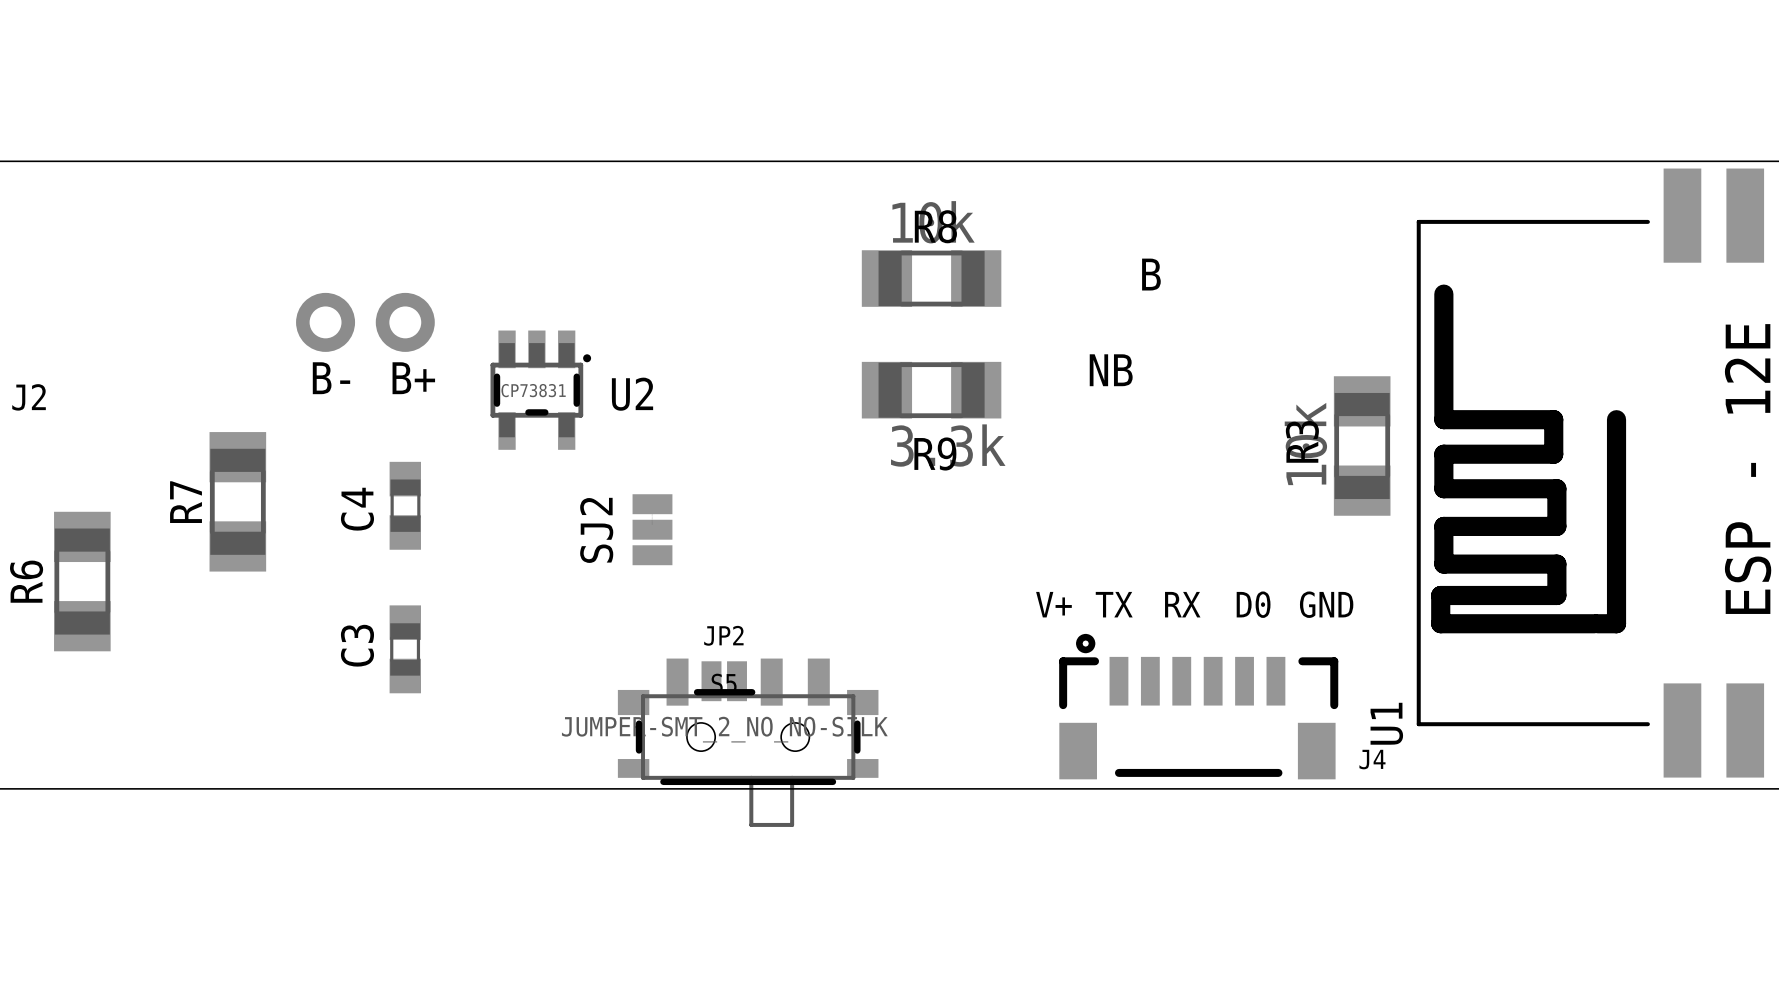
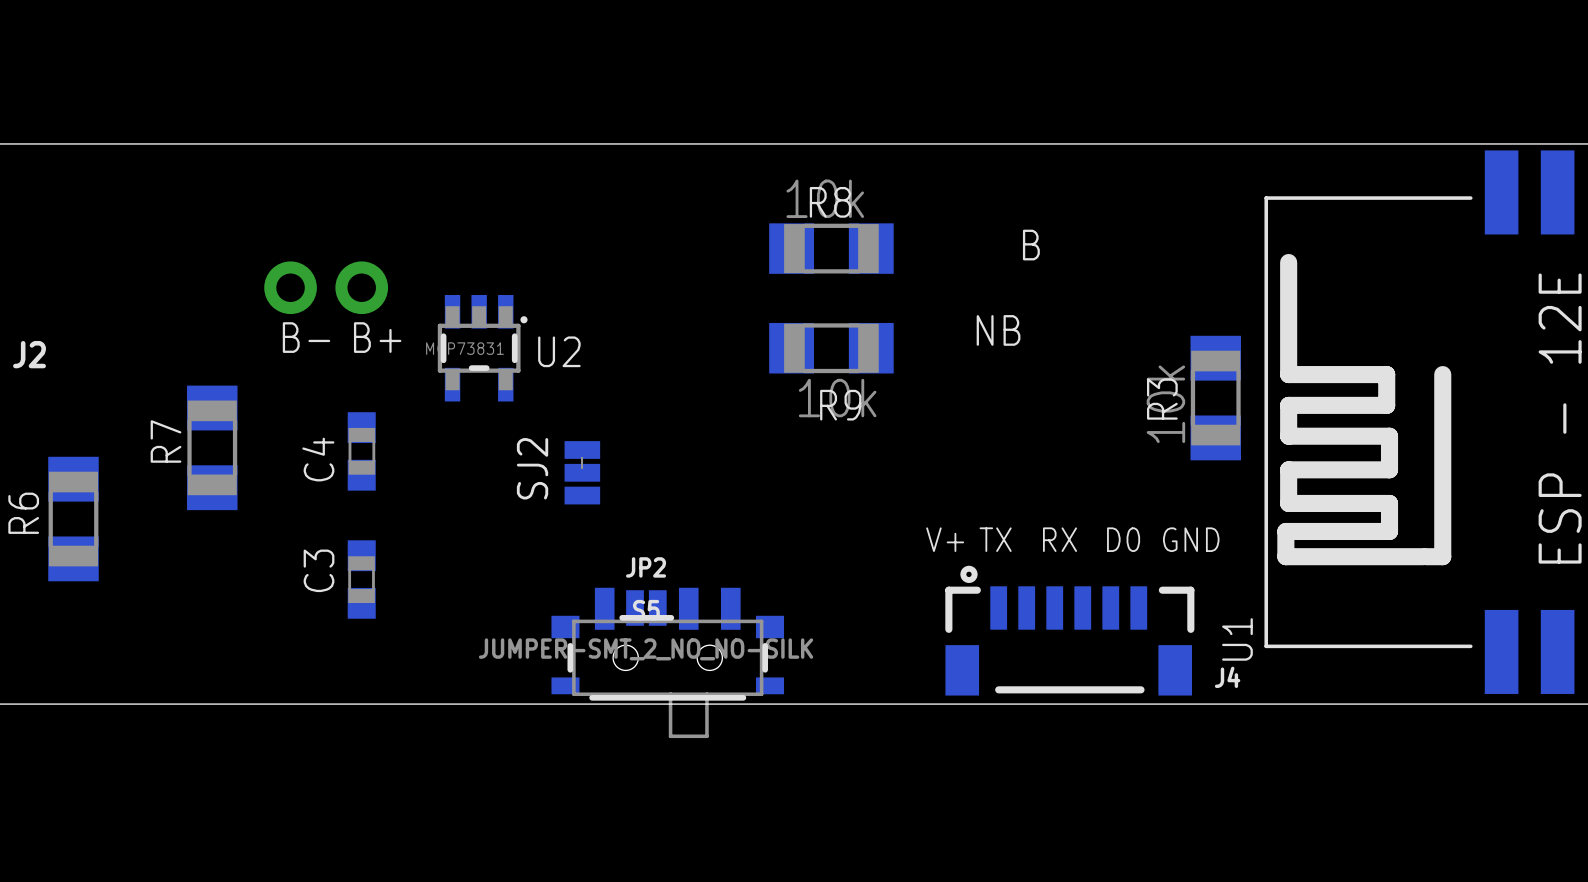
R9 value: 3.3k (948, 445) -> 10k (837, 398)

